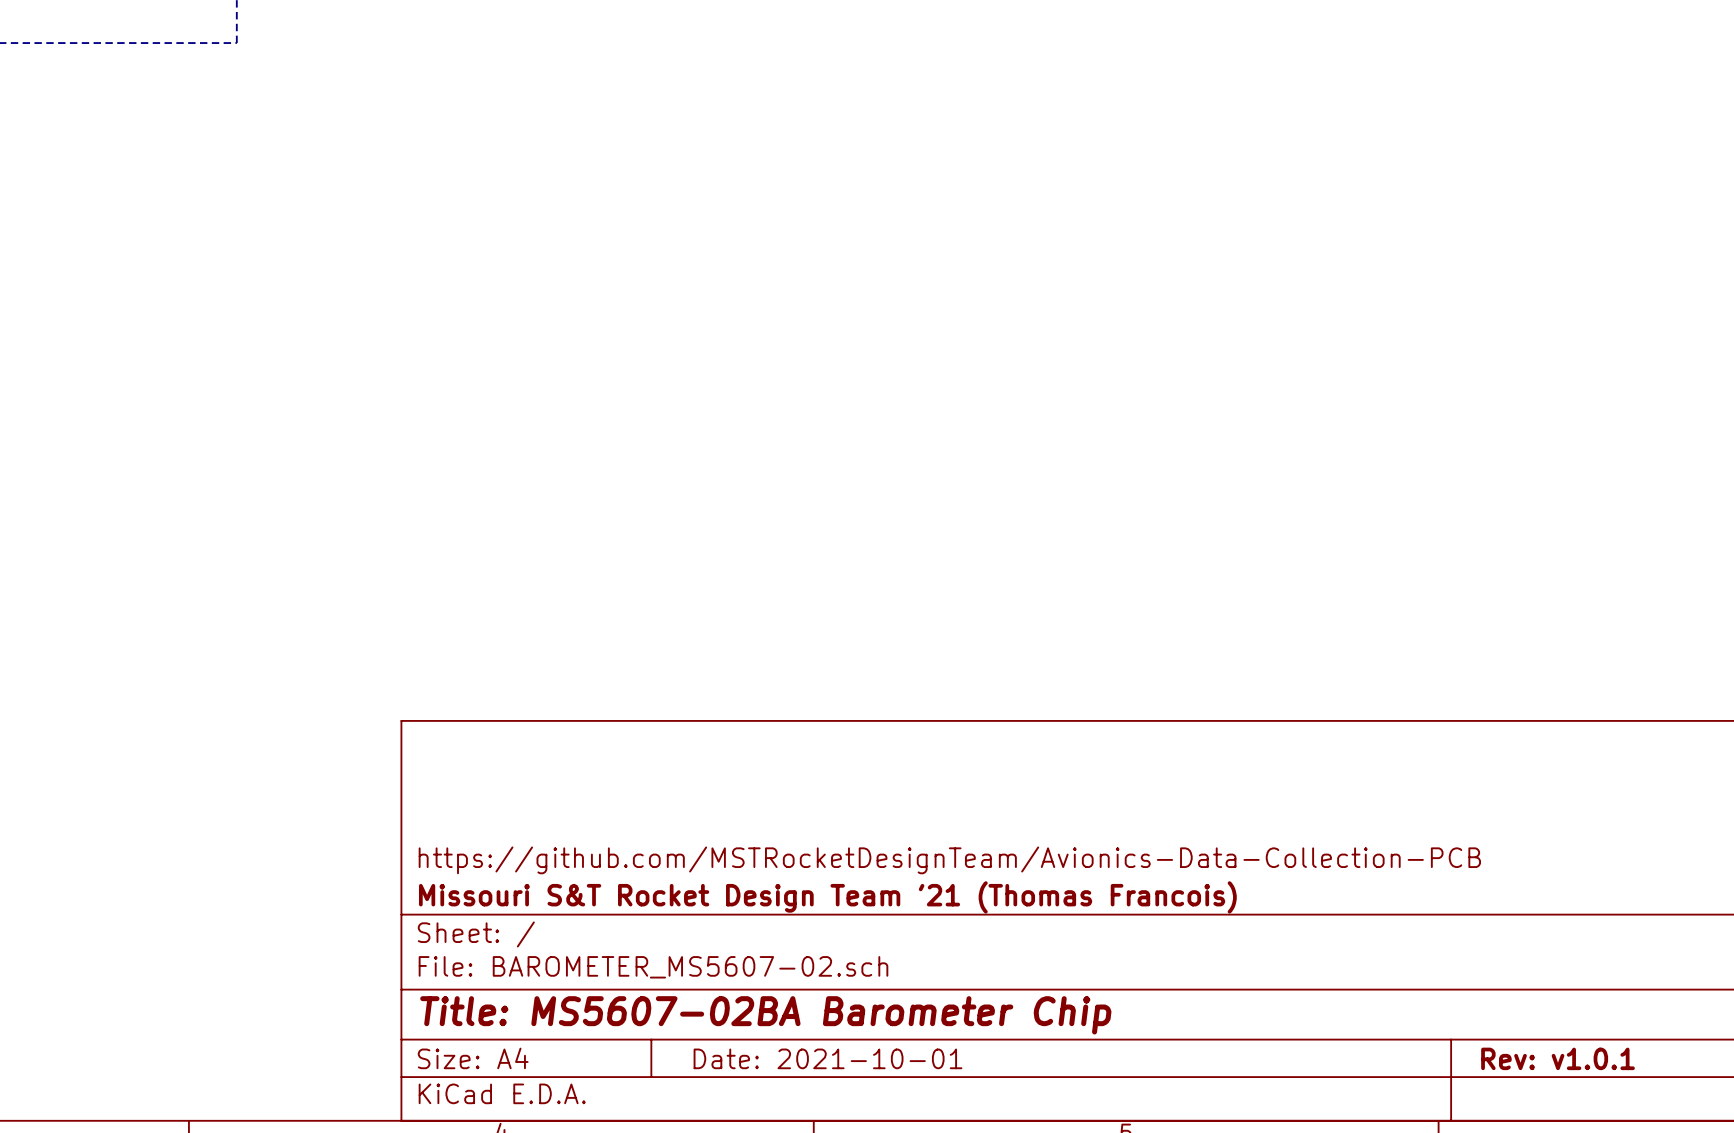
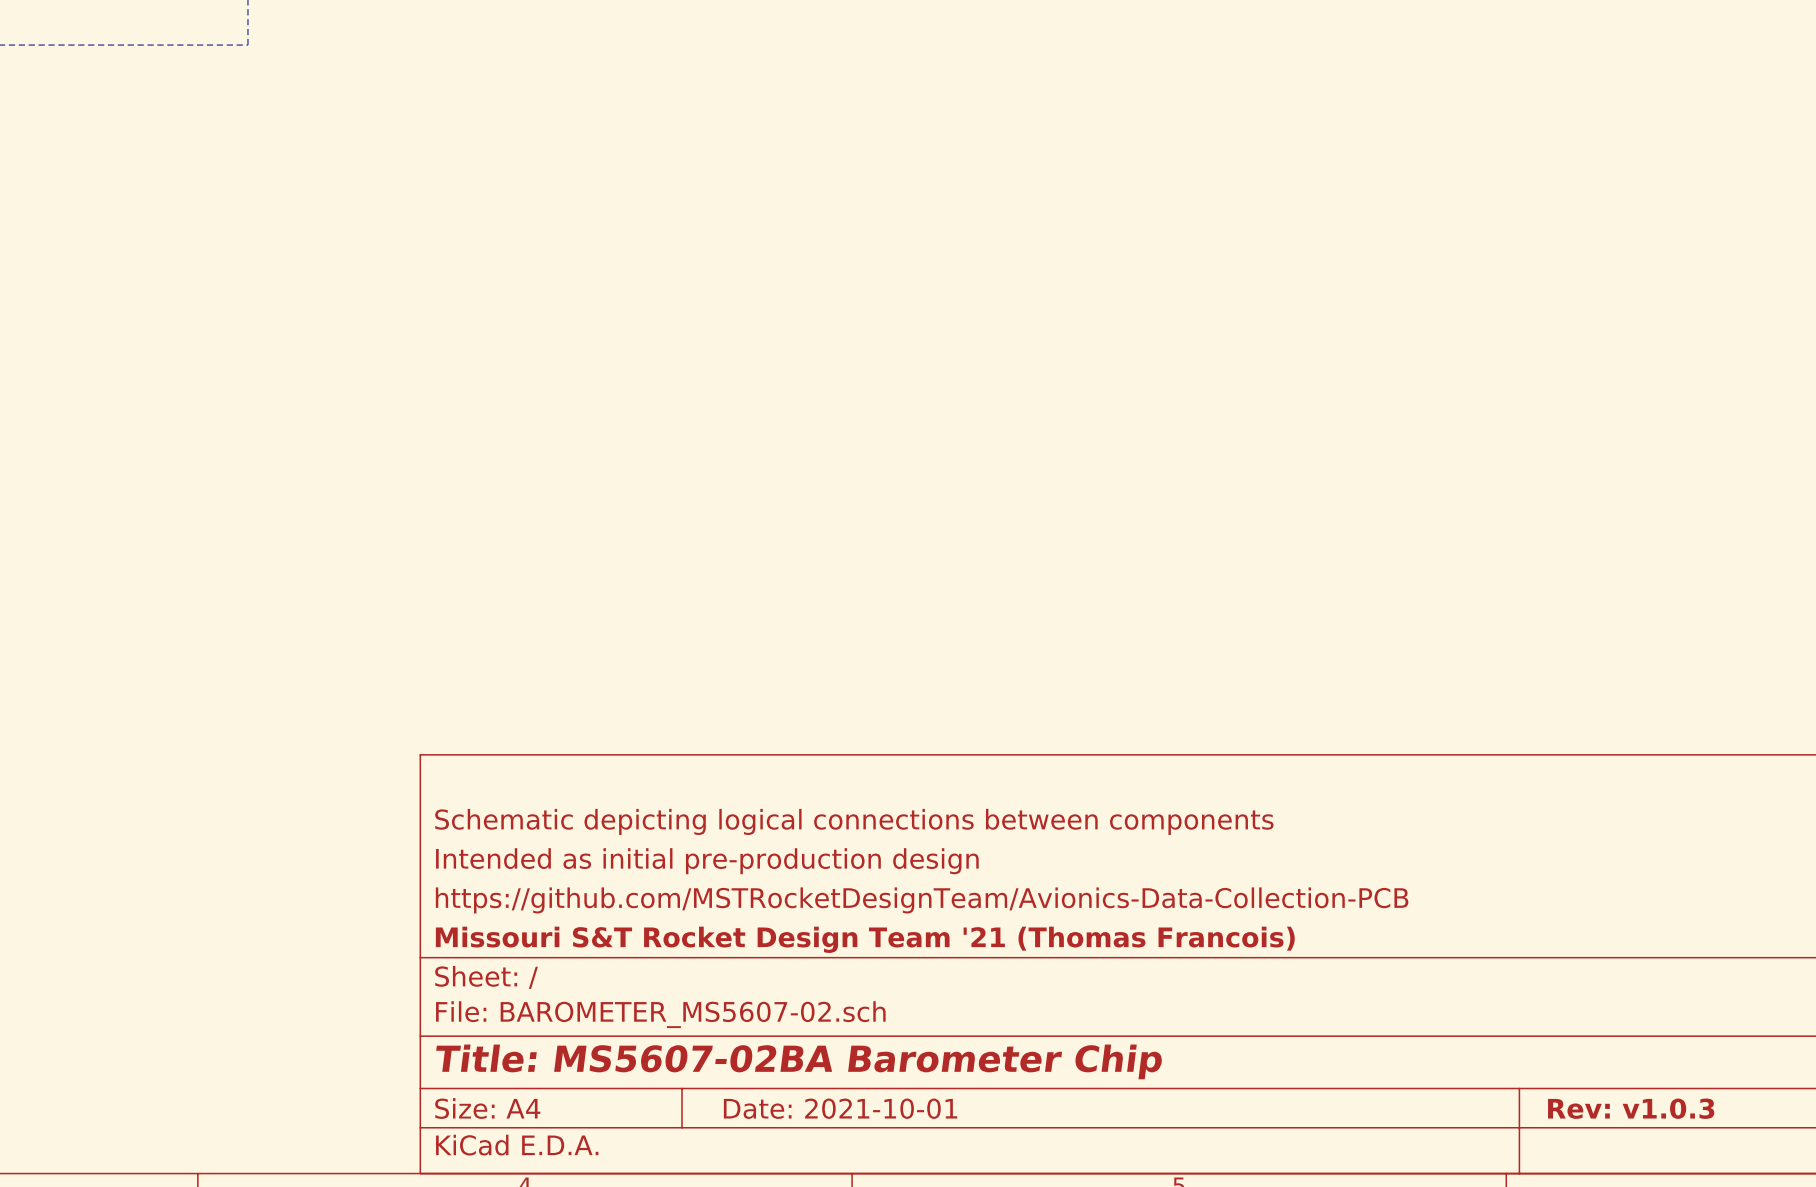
title block: none -> Schematic depicting logical connections between components (854, 821)
title block: none -> Intended as initial pre-production design (707, 861)
title block: Rev: v1.0.1 (1558, 1058) -> Rev: v1.0.3 (1631, 1108)

